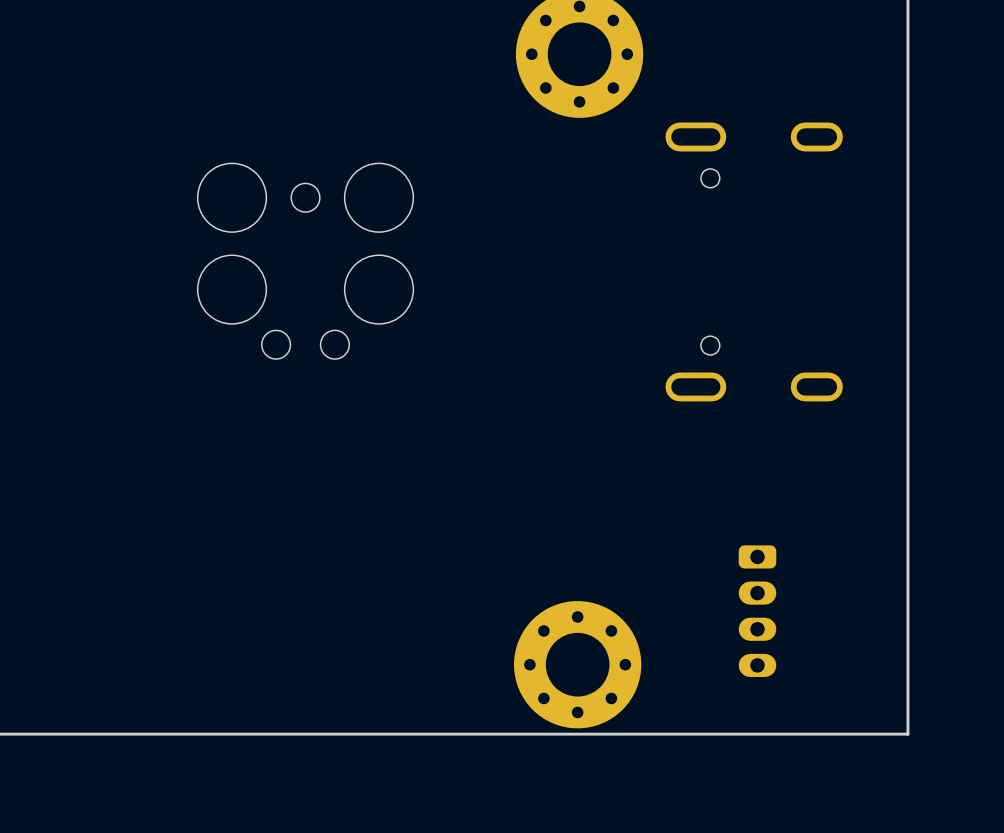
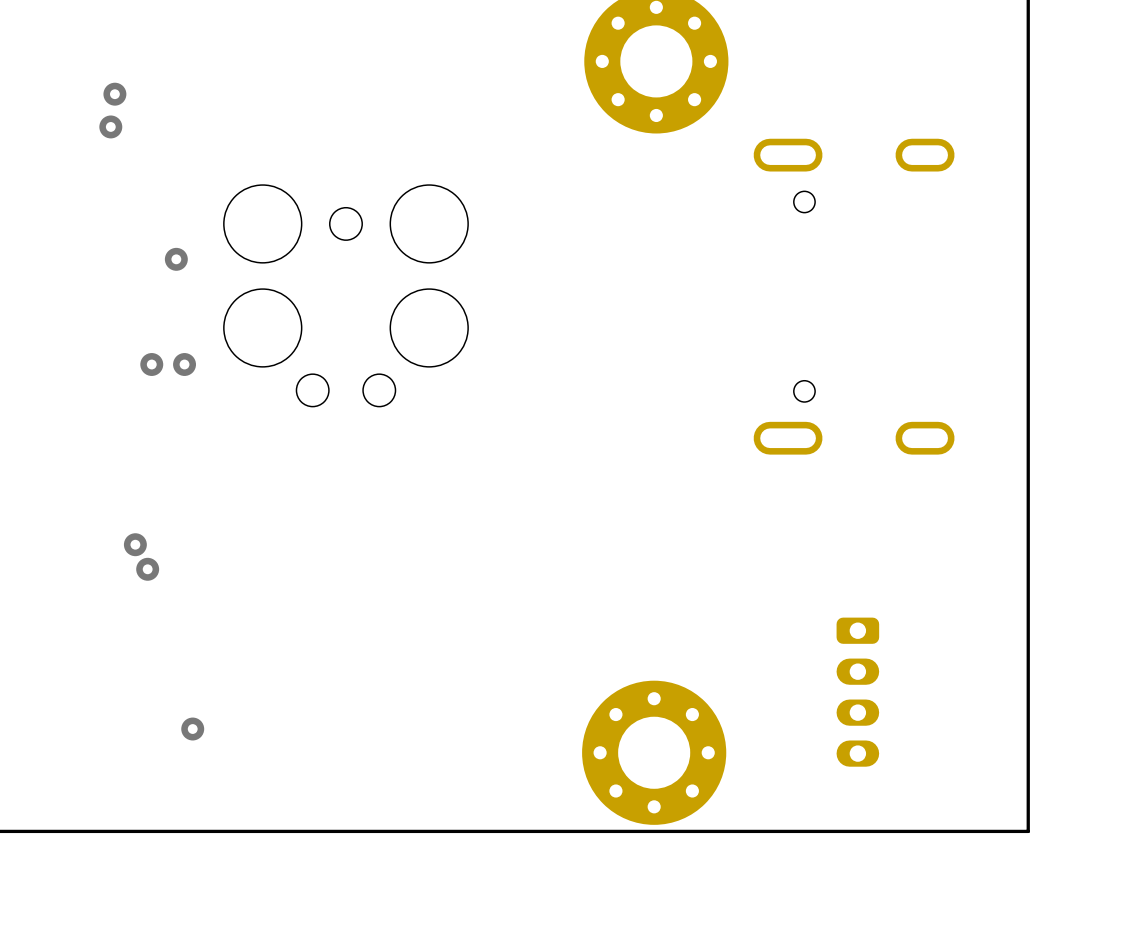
via: none -> (114, 94)
via: none -> (110, 126)
via: none -> (176, 259)
via: none -> (151, 364)
via: none -> (184, 364)
via: none -> (135, 544)
via: none -> (147, 569)
via: none -> (192, 729)

